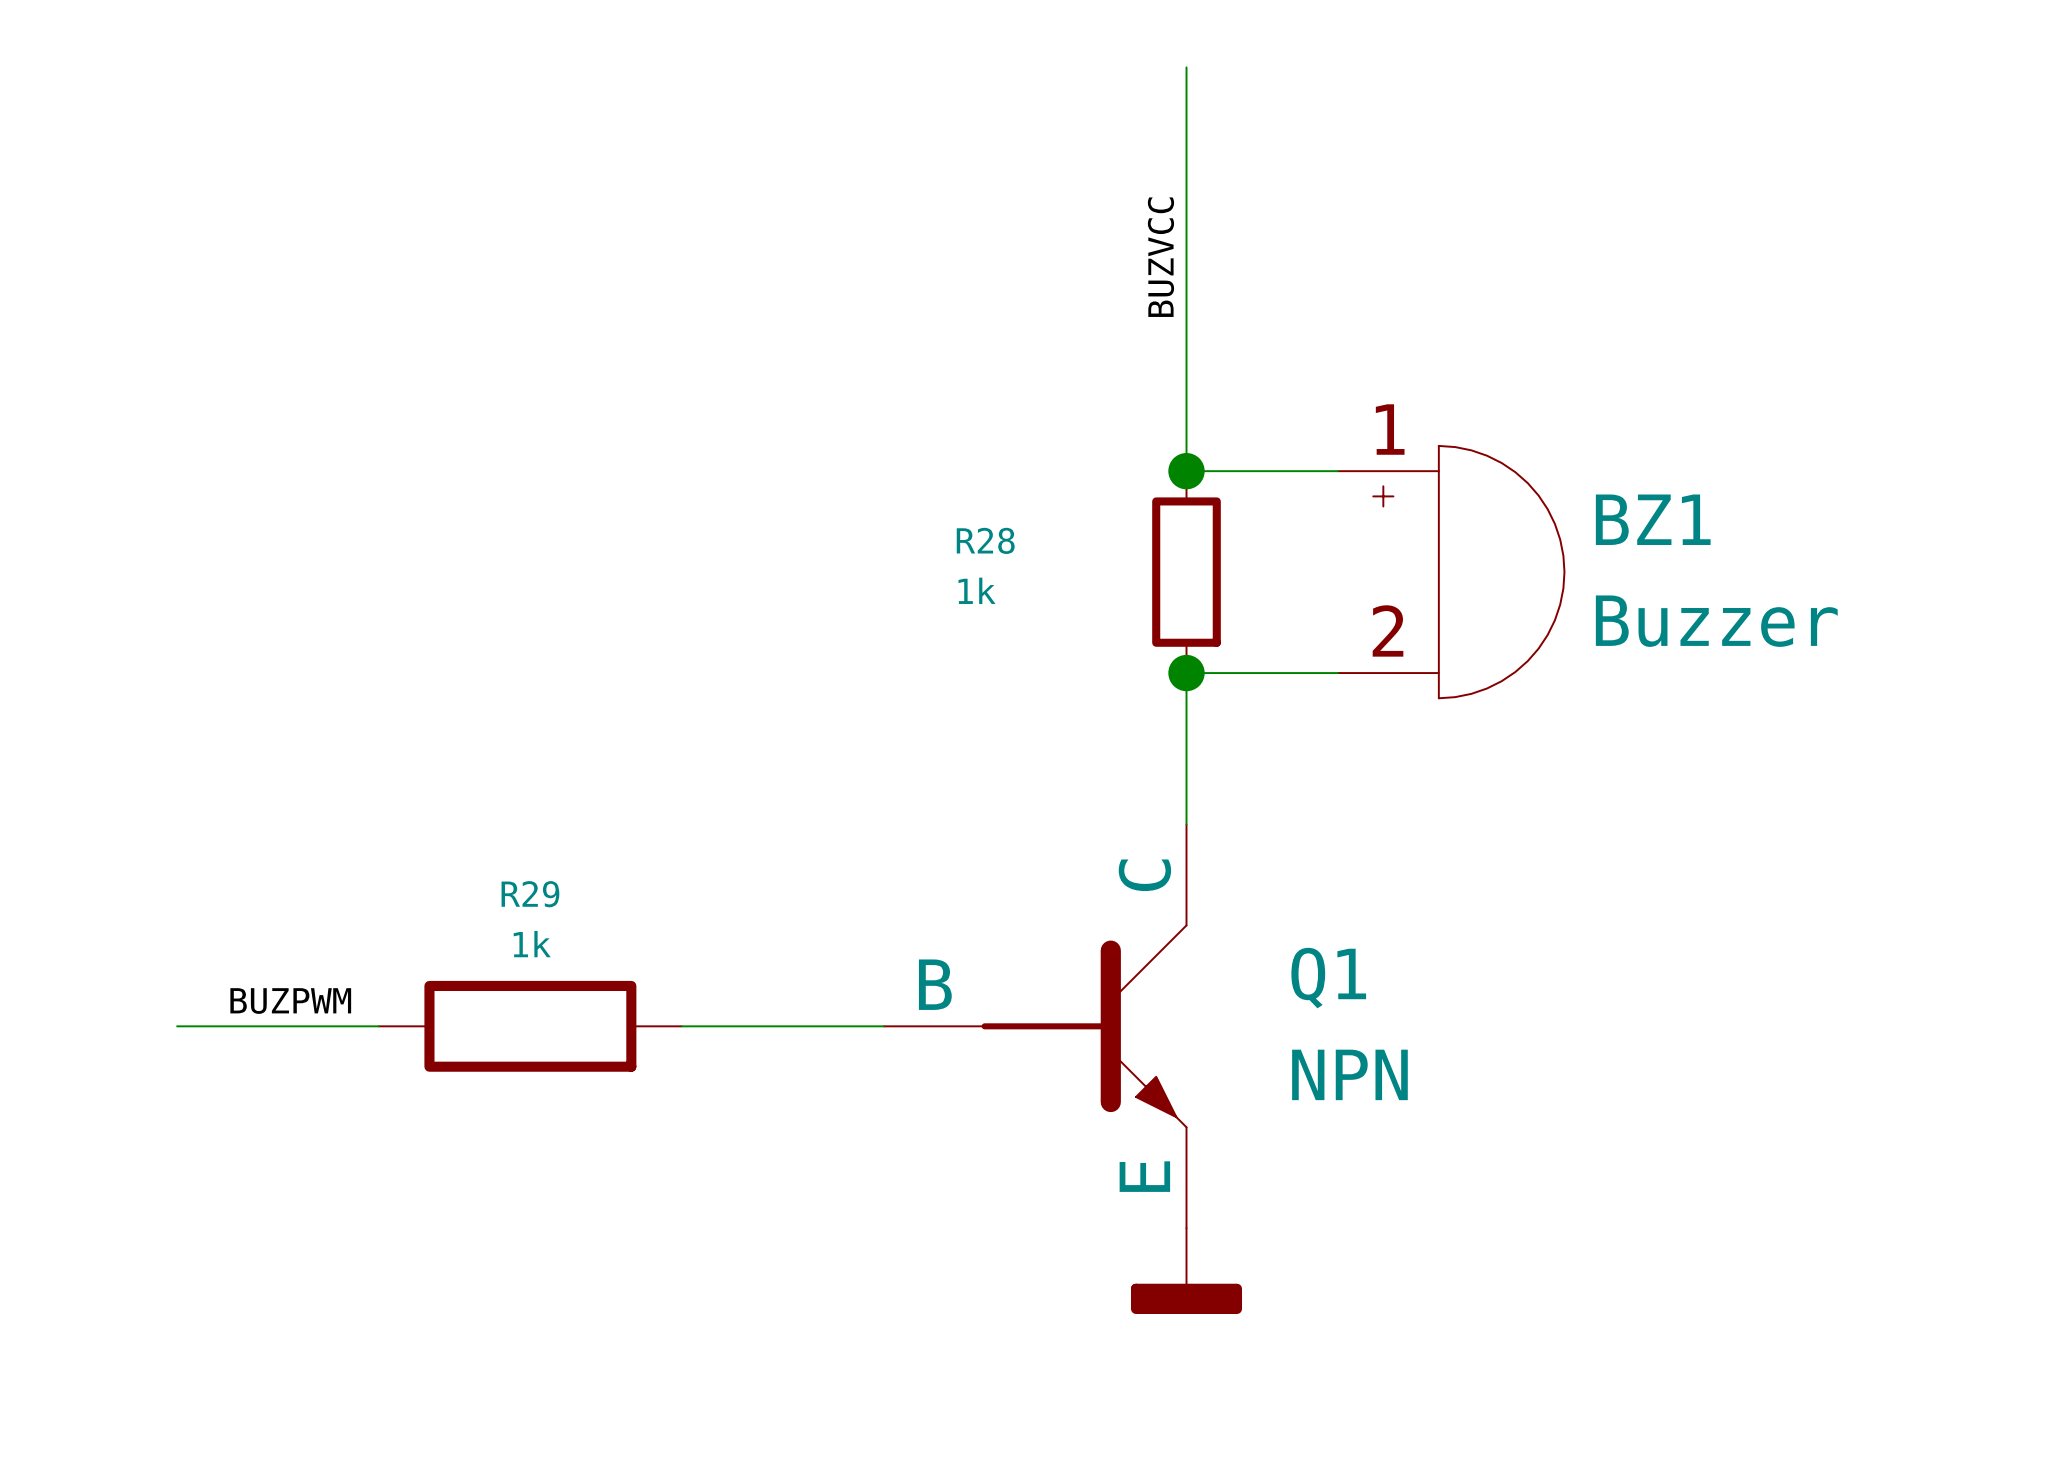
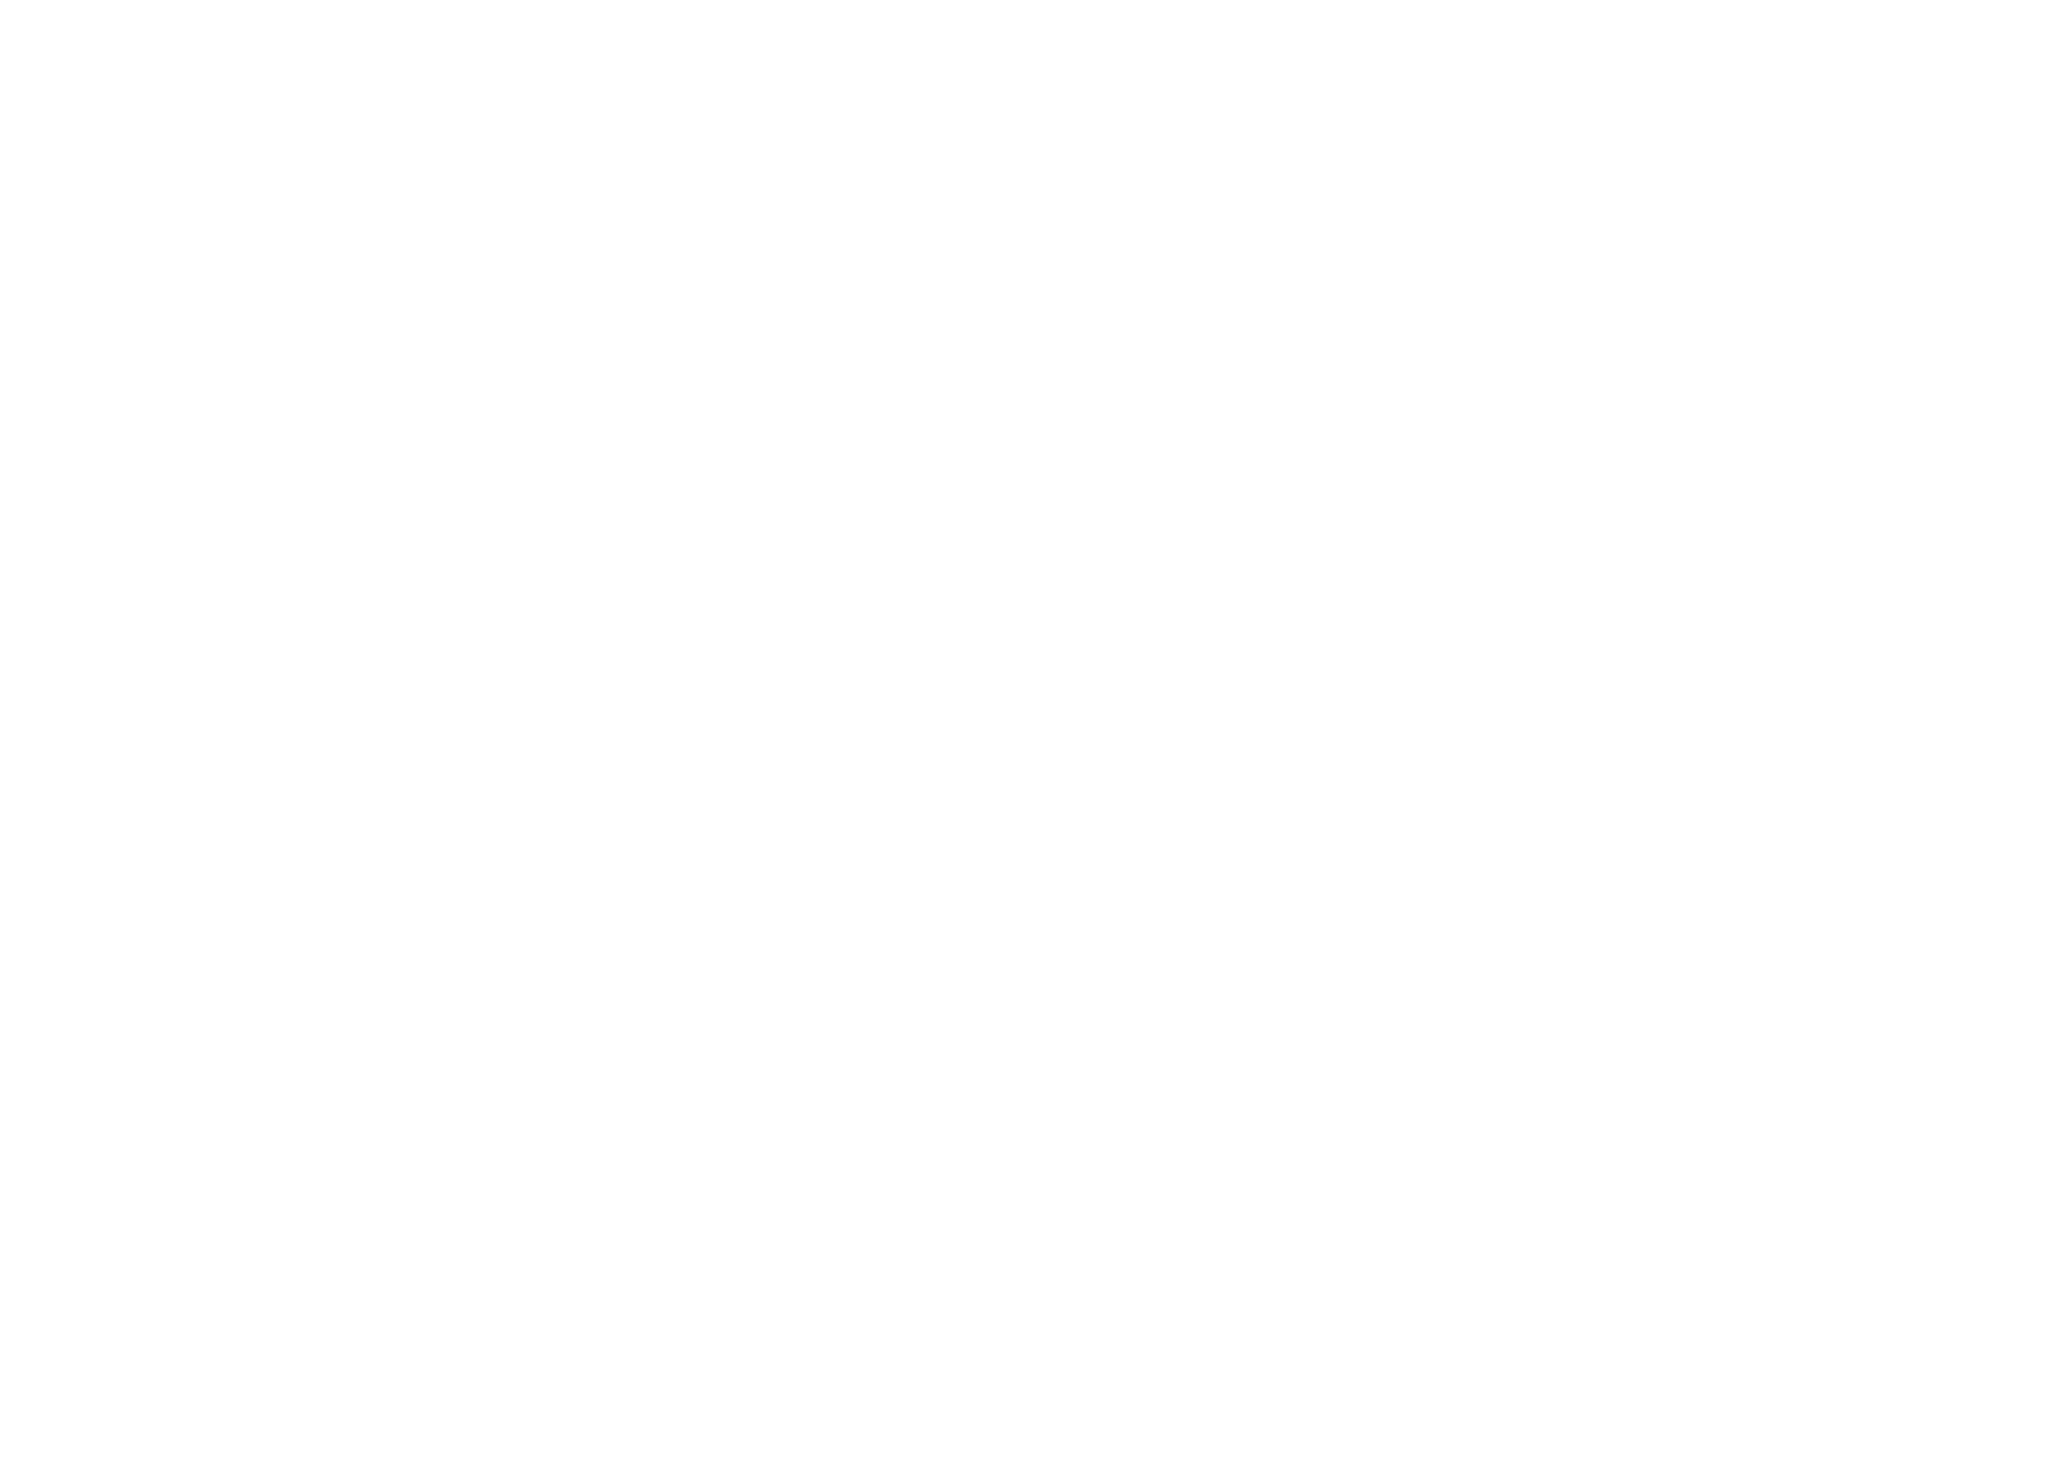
wire: (1186, 67) (1186, 471) (1337, 471) -> none
label: BUZVCC (1160, 257) -> none
junction: (1186, 471) -> none
R28: 1k (1186, 572) -> none
BZ1: Buzzer (1451, 572) -> none
junction: (1186, 673) -> none
wire: (1337, 673) (1186, 673) (1186, 824) -> none
label: BUZPWM (290, 1001) -> none
wire: (177, 1026) (378, 1026) -> none
R29: 1k (530, 1026) -> none
wire: (681, 1026) (883, 1026) -> none
Q1: NPN (1041, 1026) -> none
power symbol: (1186, 1271) -> none

